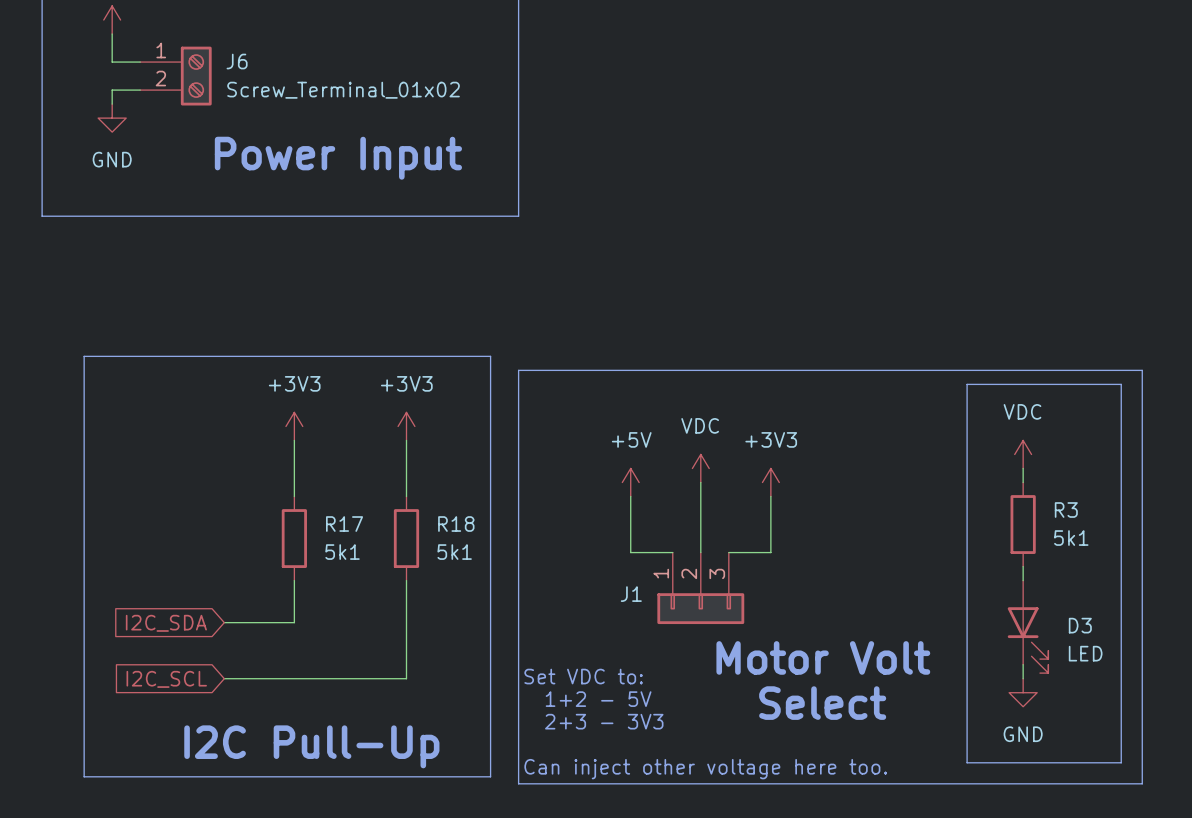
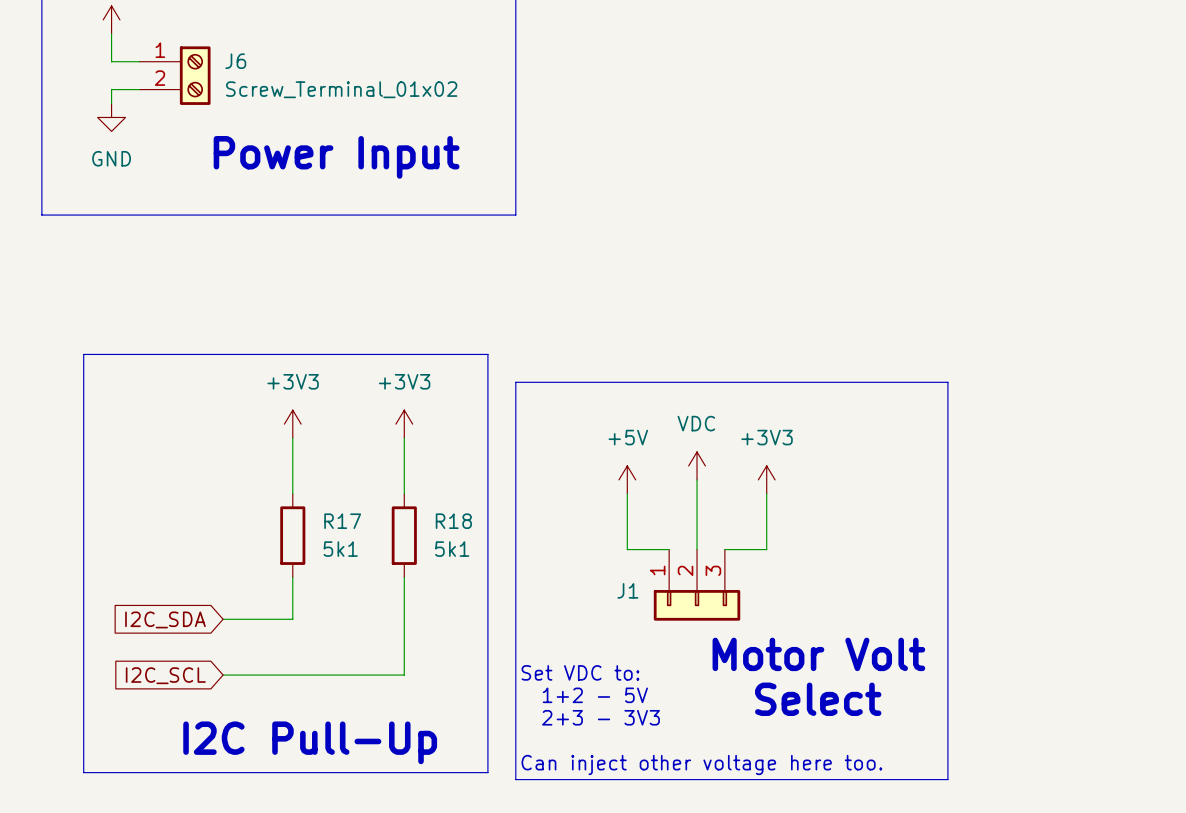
line: (518, 384) (518, 370) (1142, 370) (1142, 783) (953, 783) -> (515, 382) (947, 382) (947, 779)
line: (967, 384) (1121, 384) (1121, 762) (967, 762) (967, 384) -> none
power symbol: VDC (1023, 454) -> none
wire: (1023, 468) (1023, 482) -> none
R3: 5k1 (1023, 524) -> none
wire: (1023, 566) (1023, 580) -> none
D3: LED (1028, 626) -> none
wire: (1023, 664) (1023, 678) -> none
power symbol: GND (1023, 692) -> none

